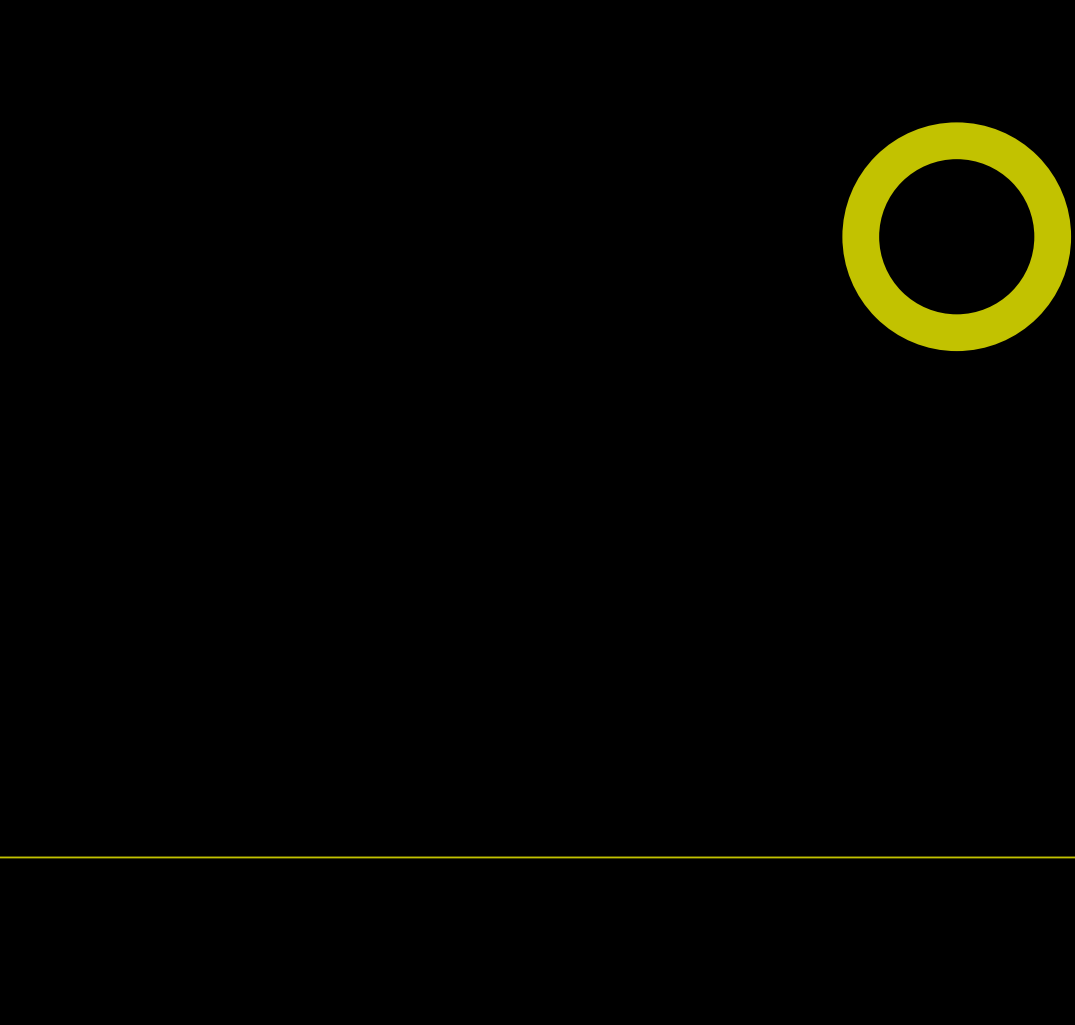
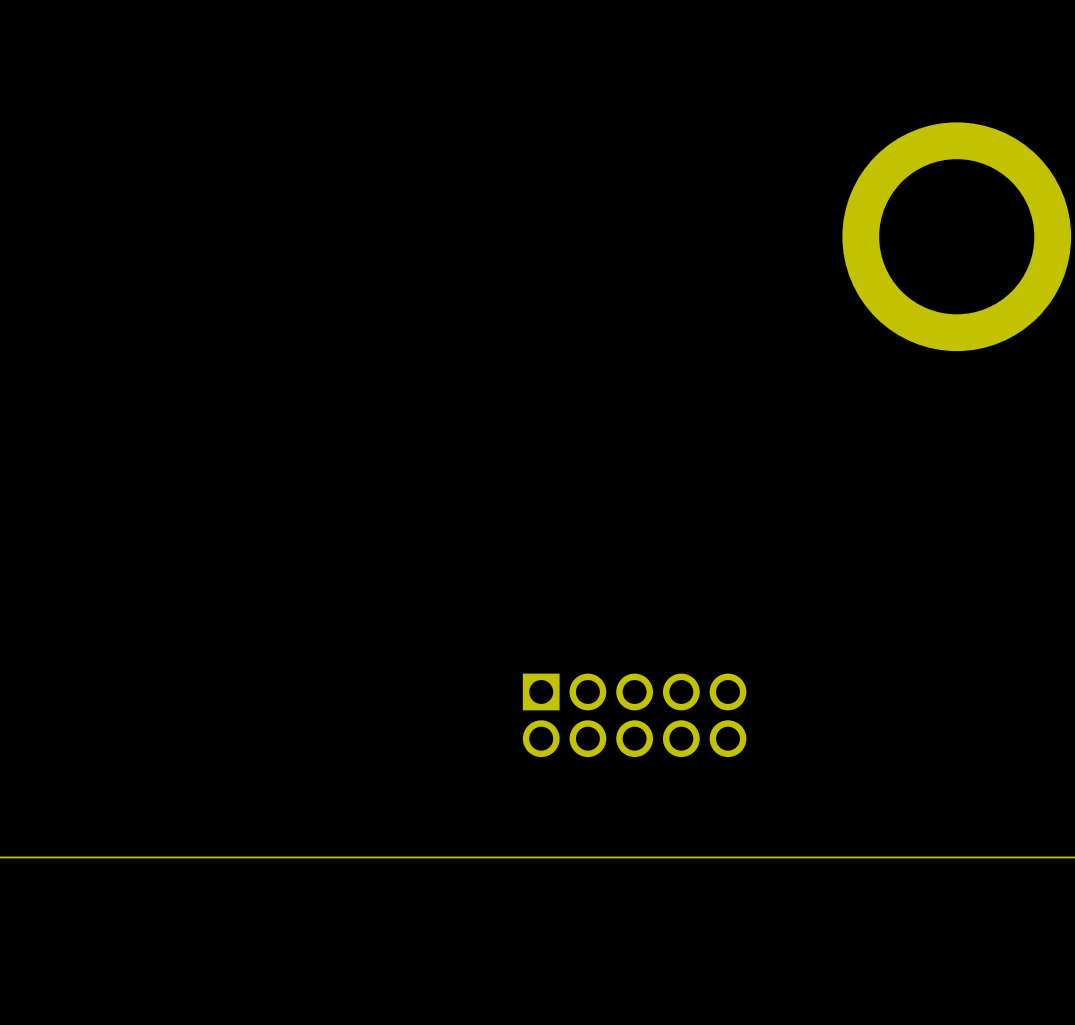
part: none -> (634, 715)

